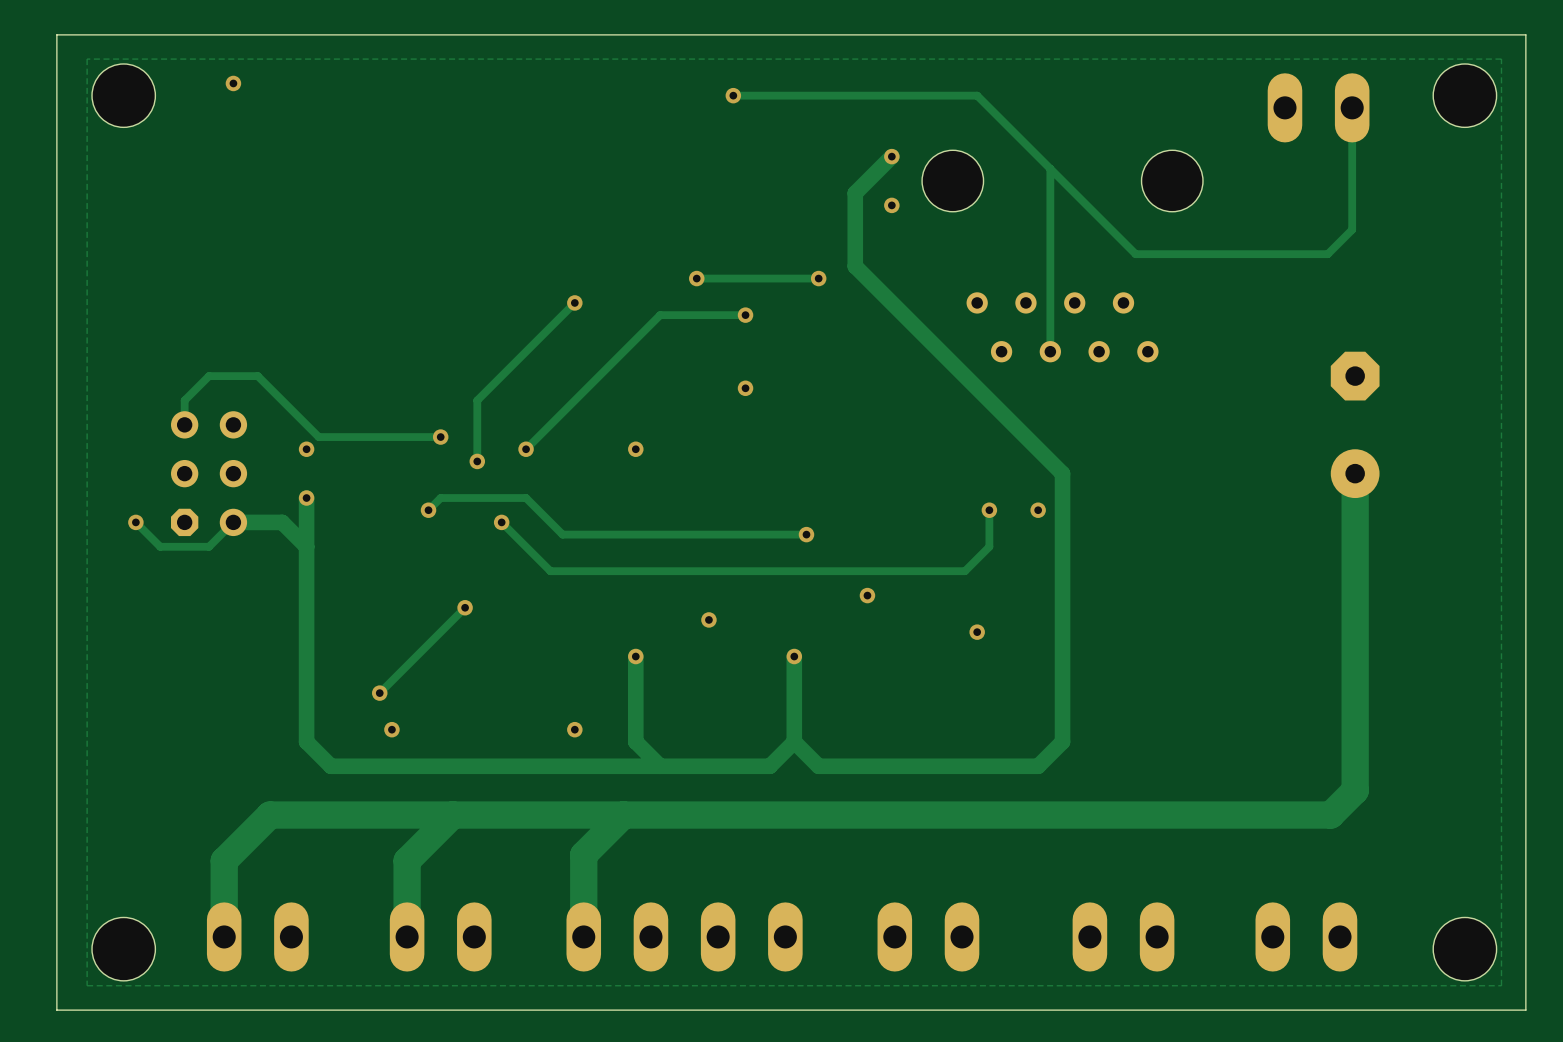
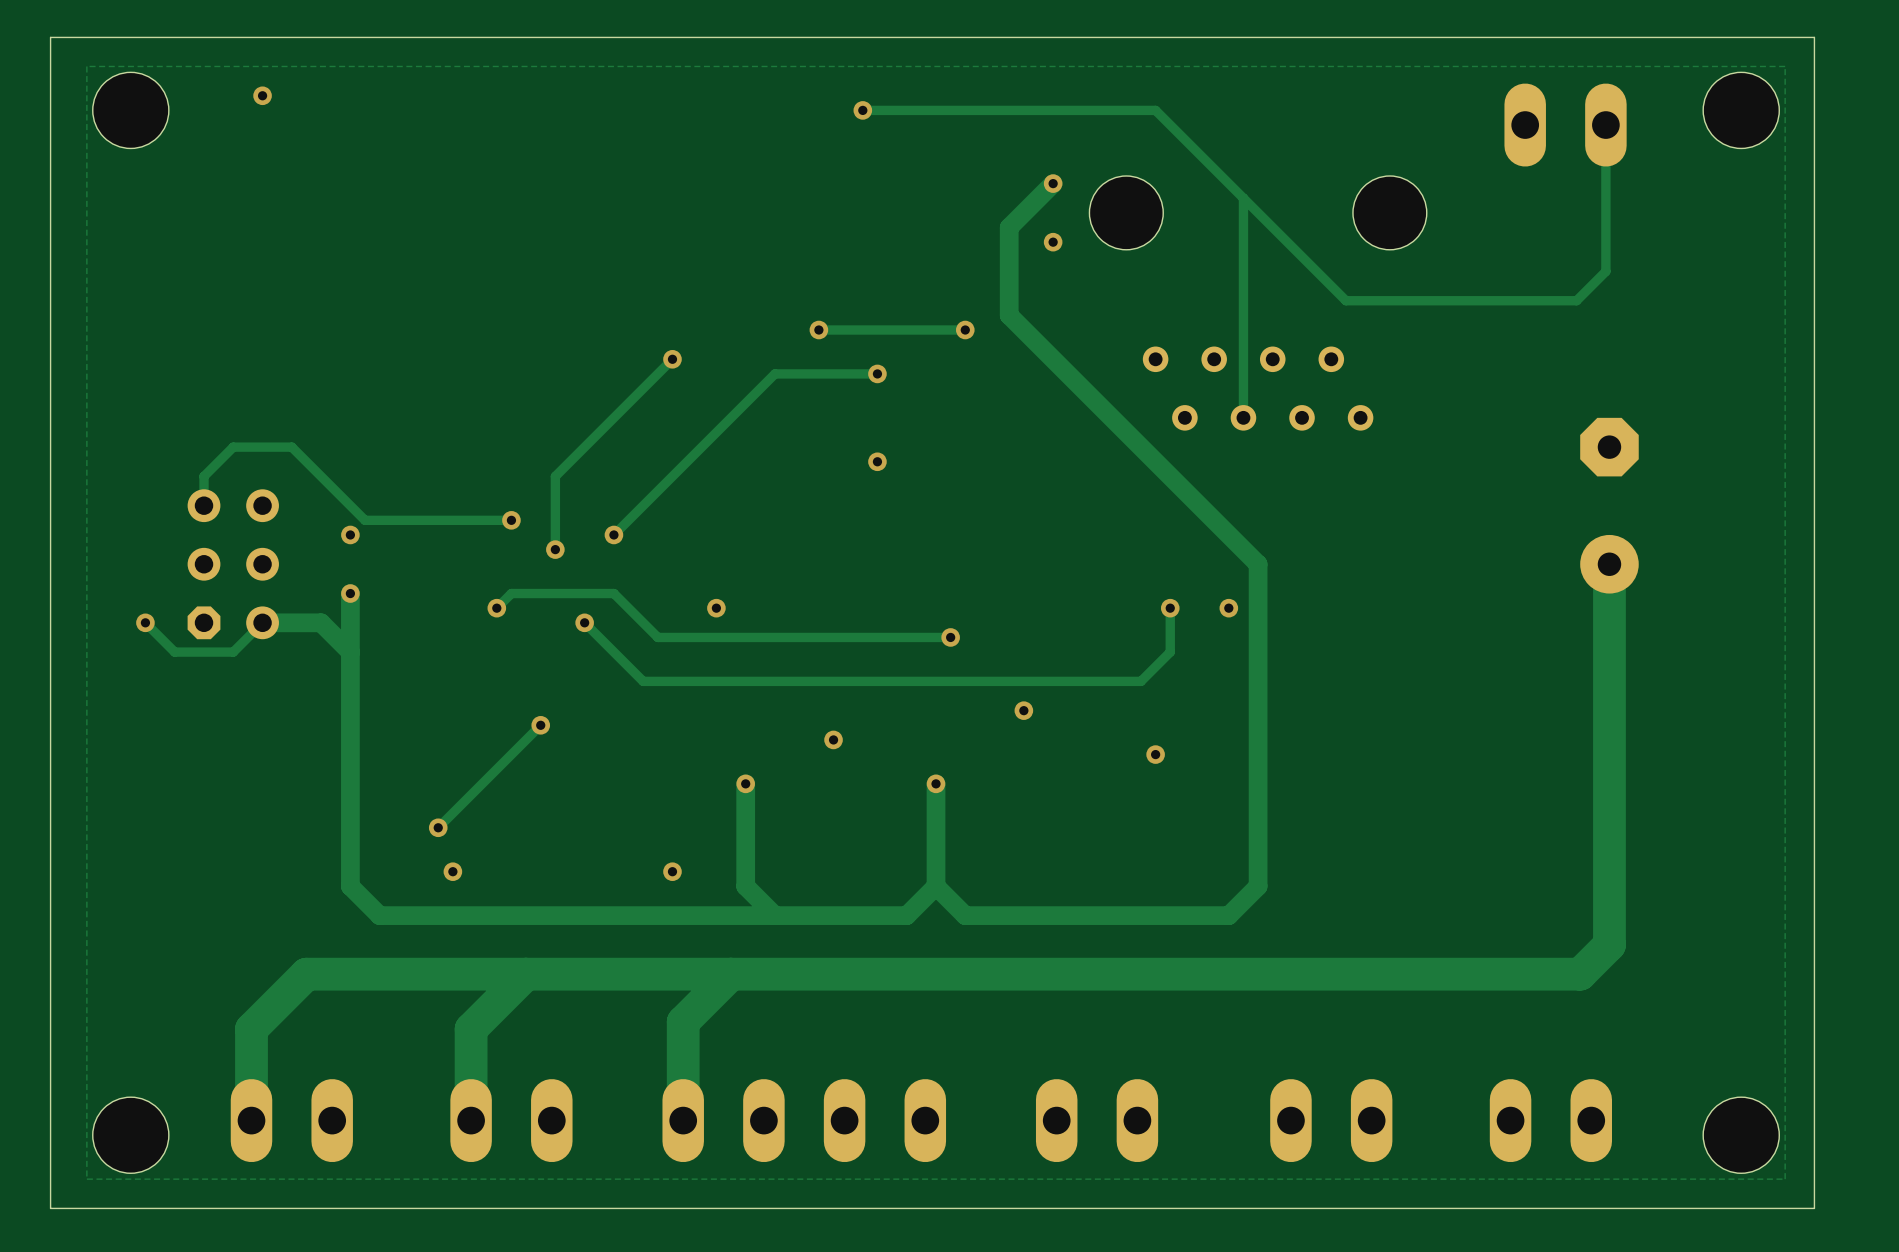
via position: (635, 449) -> (716, 608)

